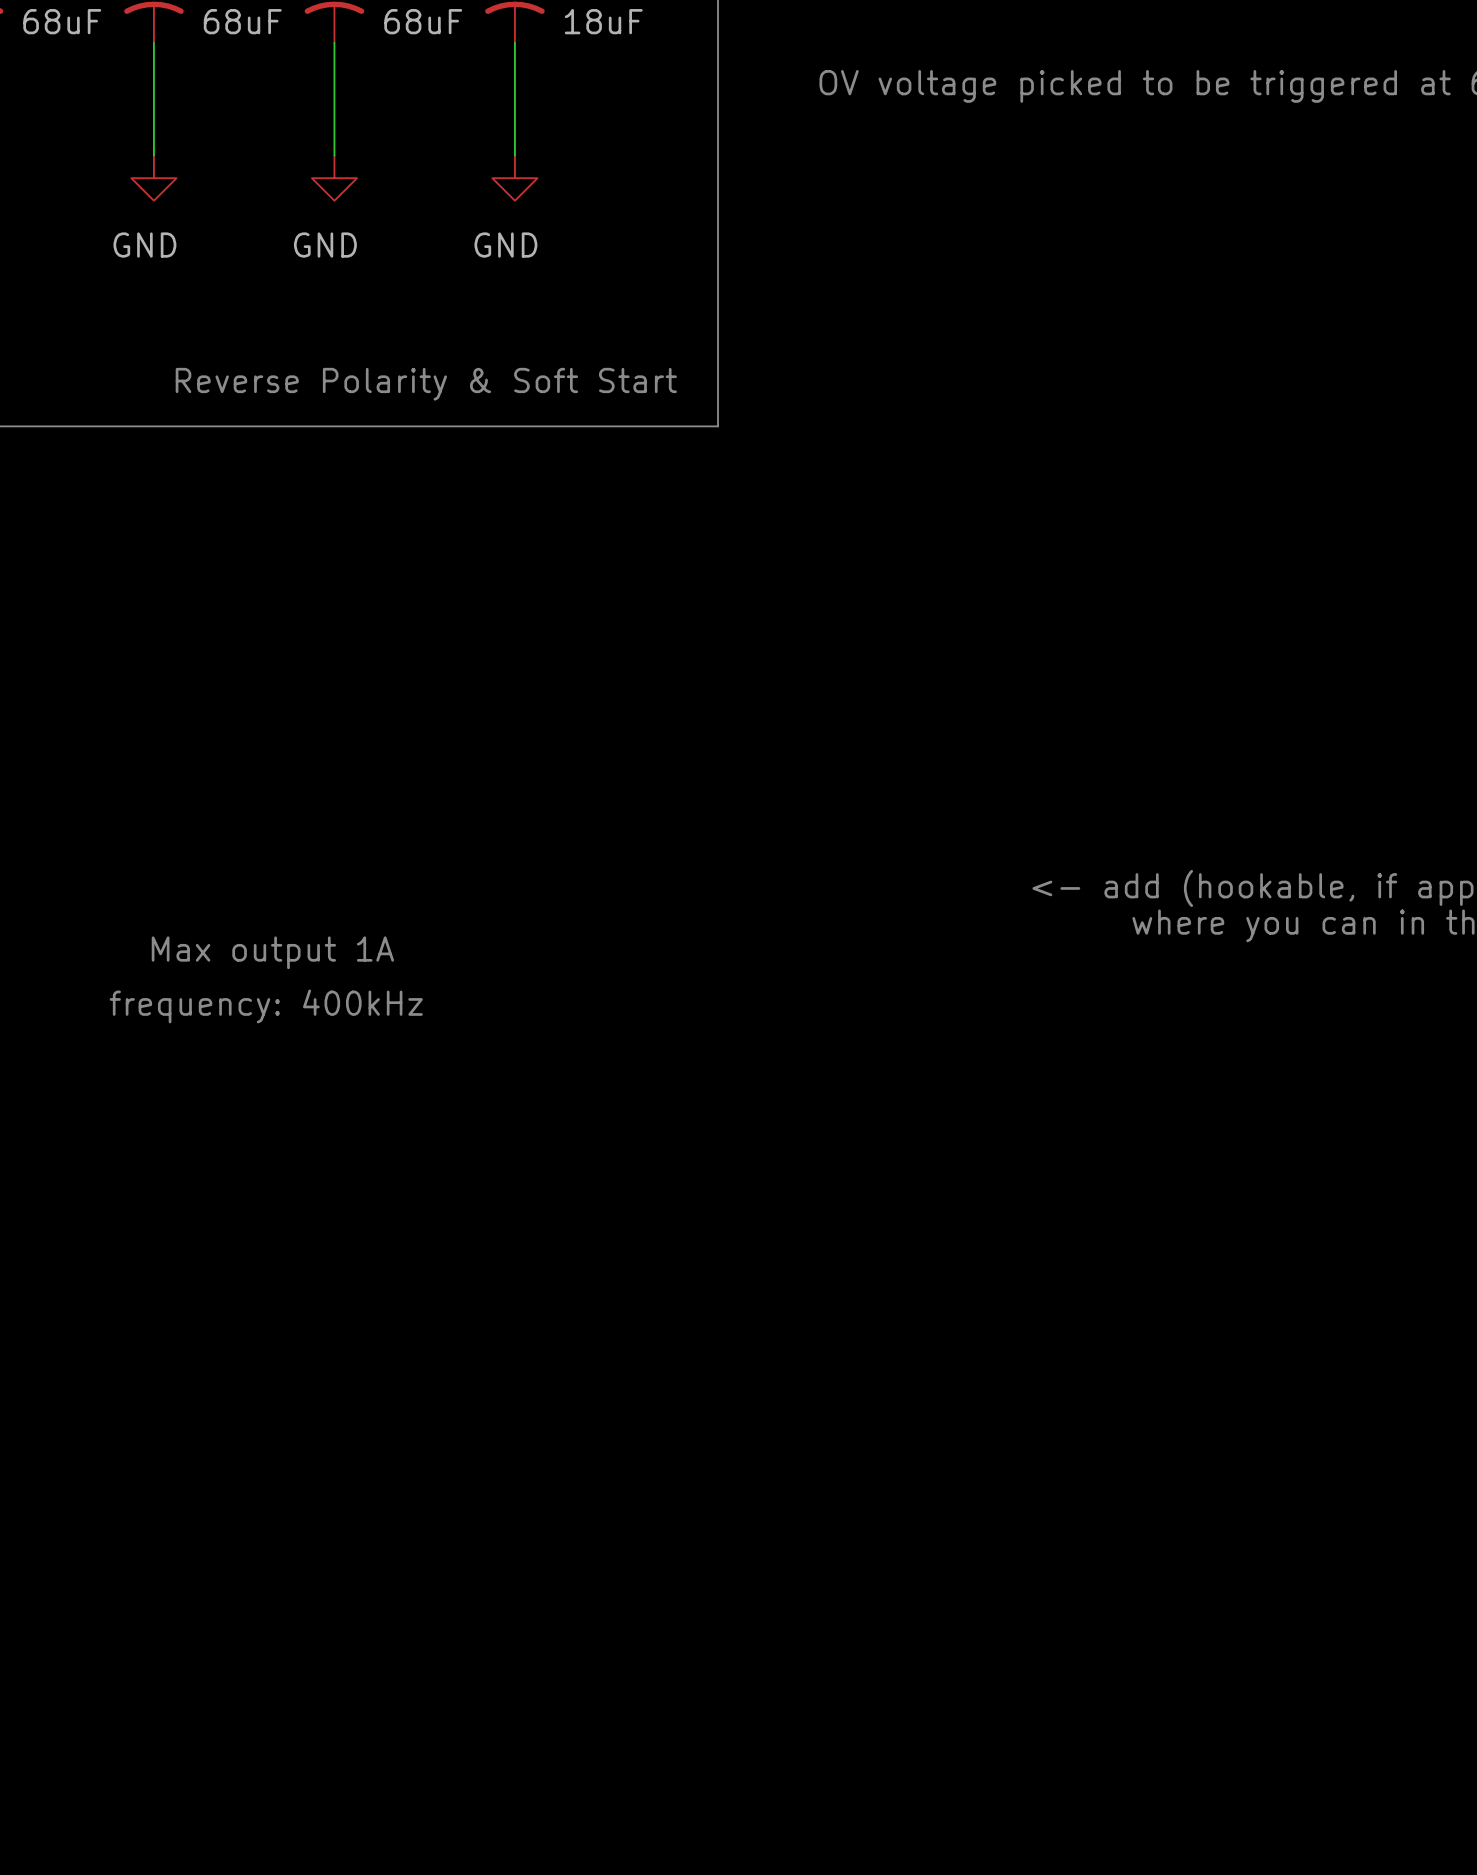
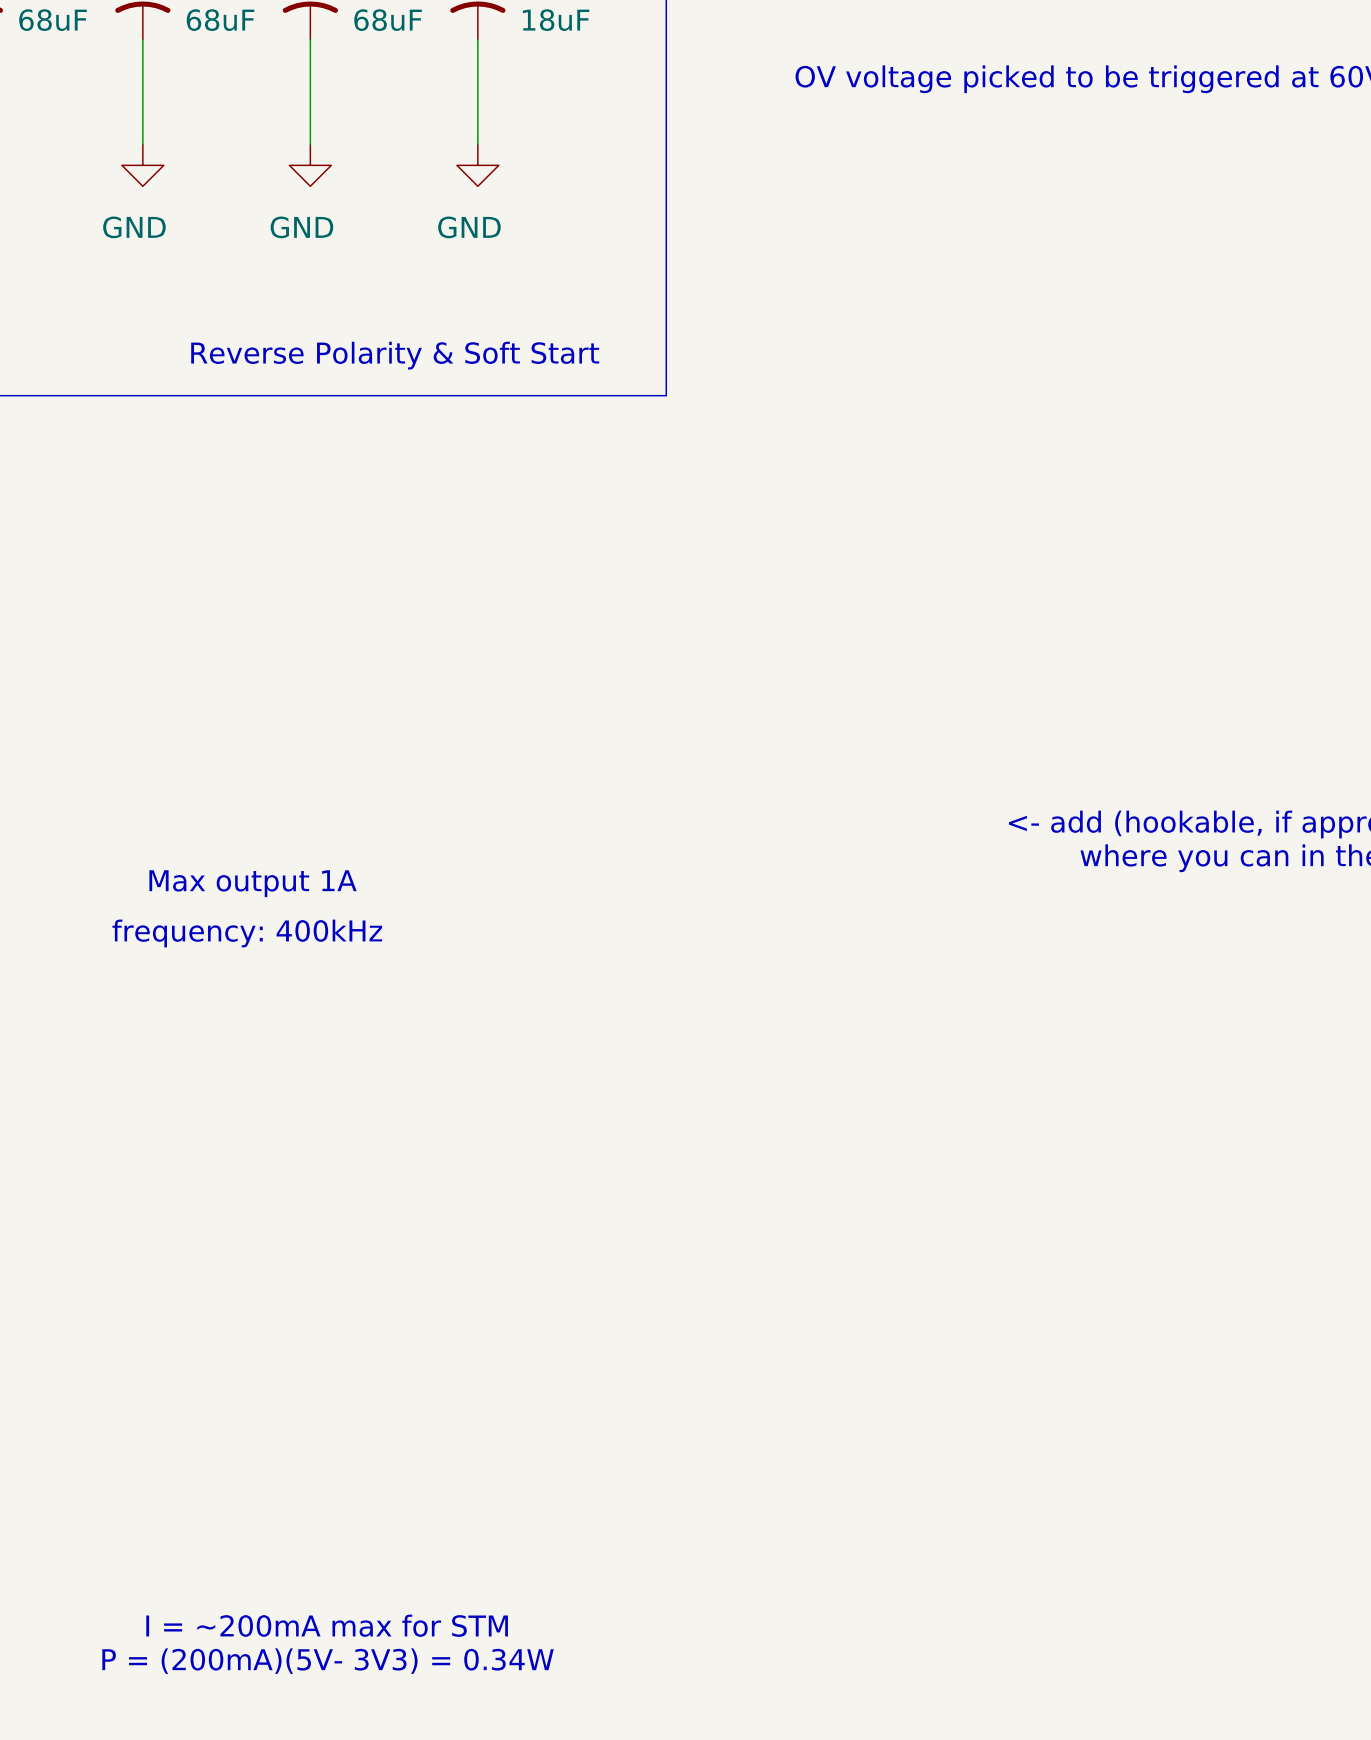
text: none -> I = ~200mA max for STM (327, 1625)
text: none -> P = (200mA)(5V- 3V3) = 0.34W (328, 1661)

